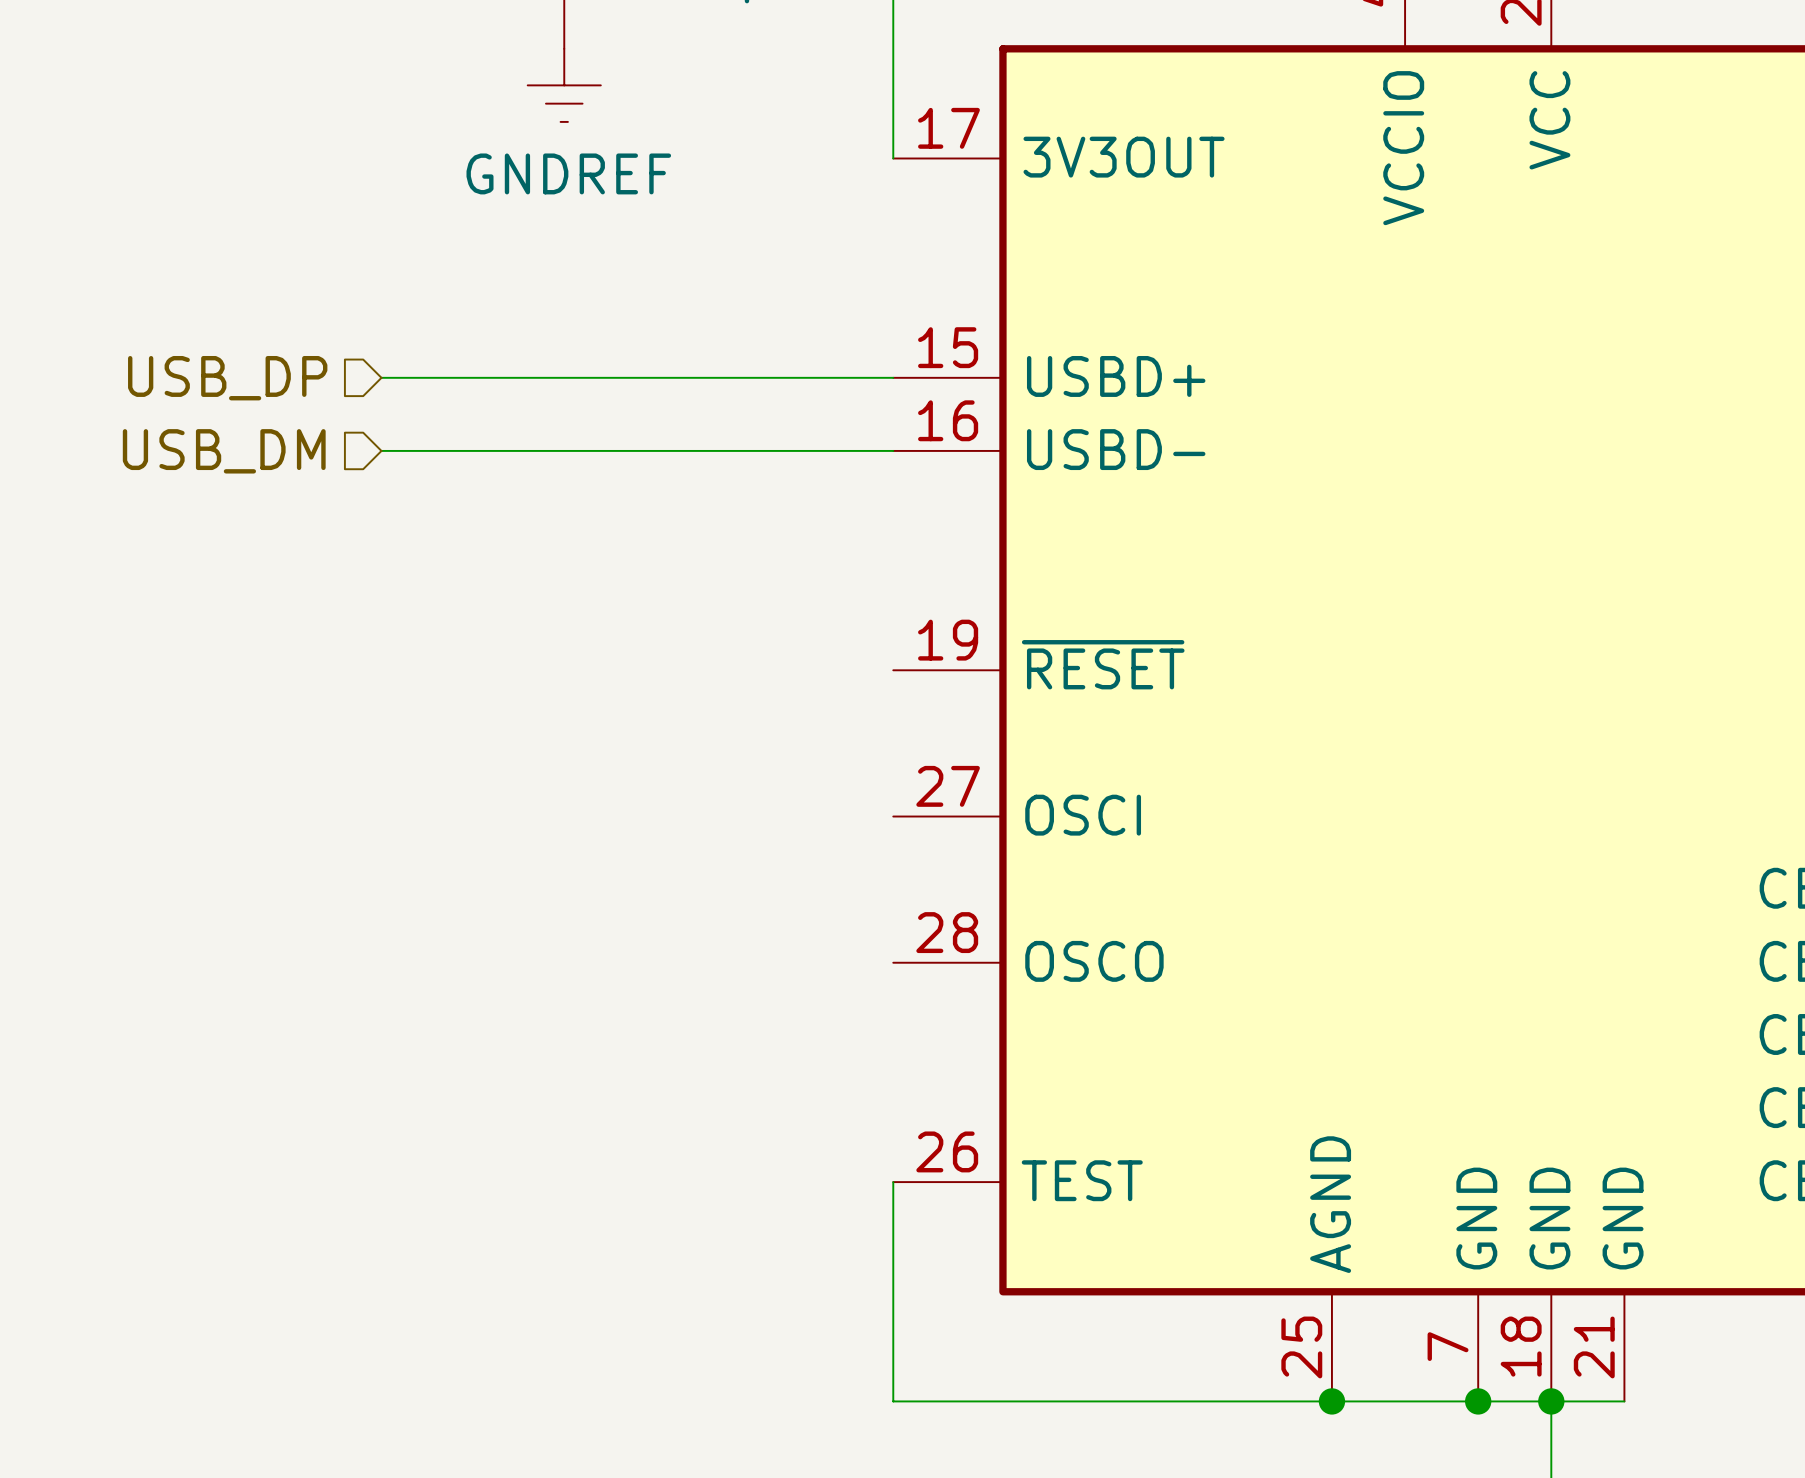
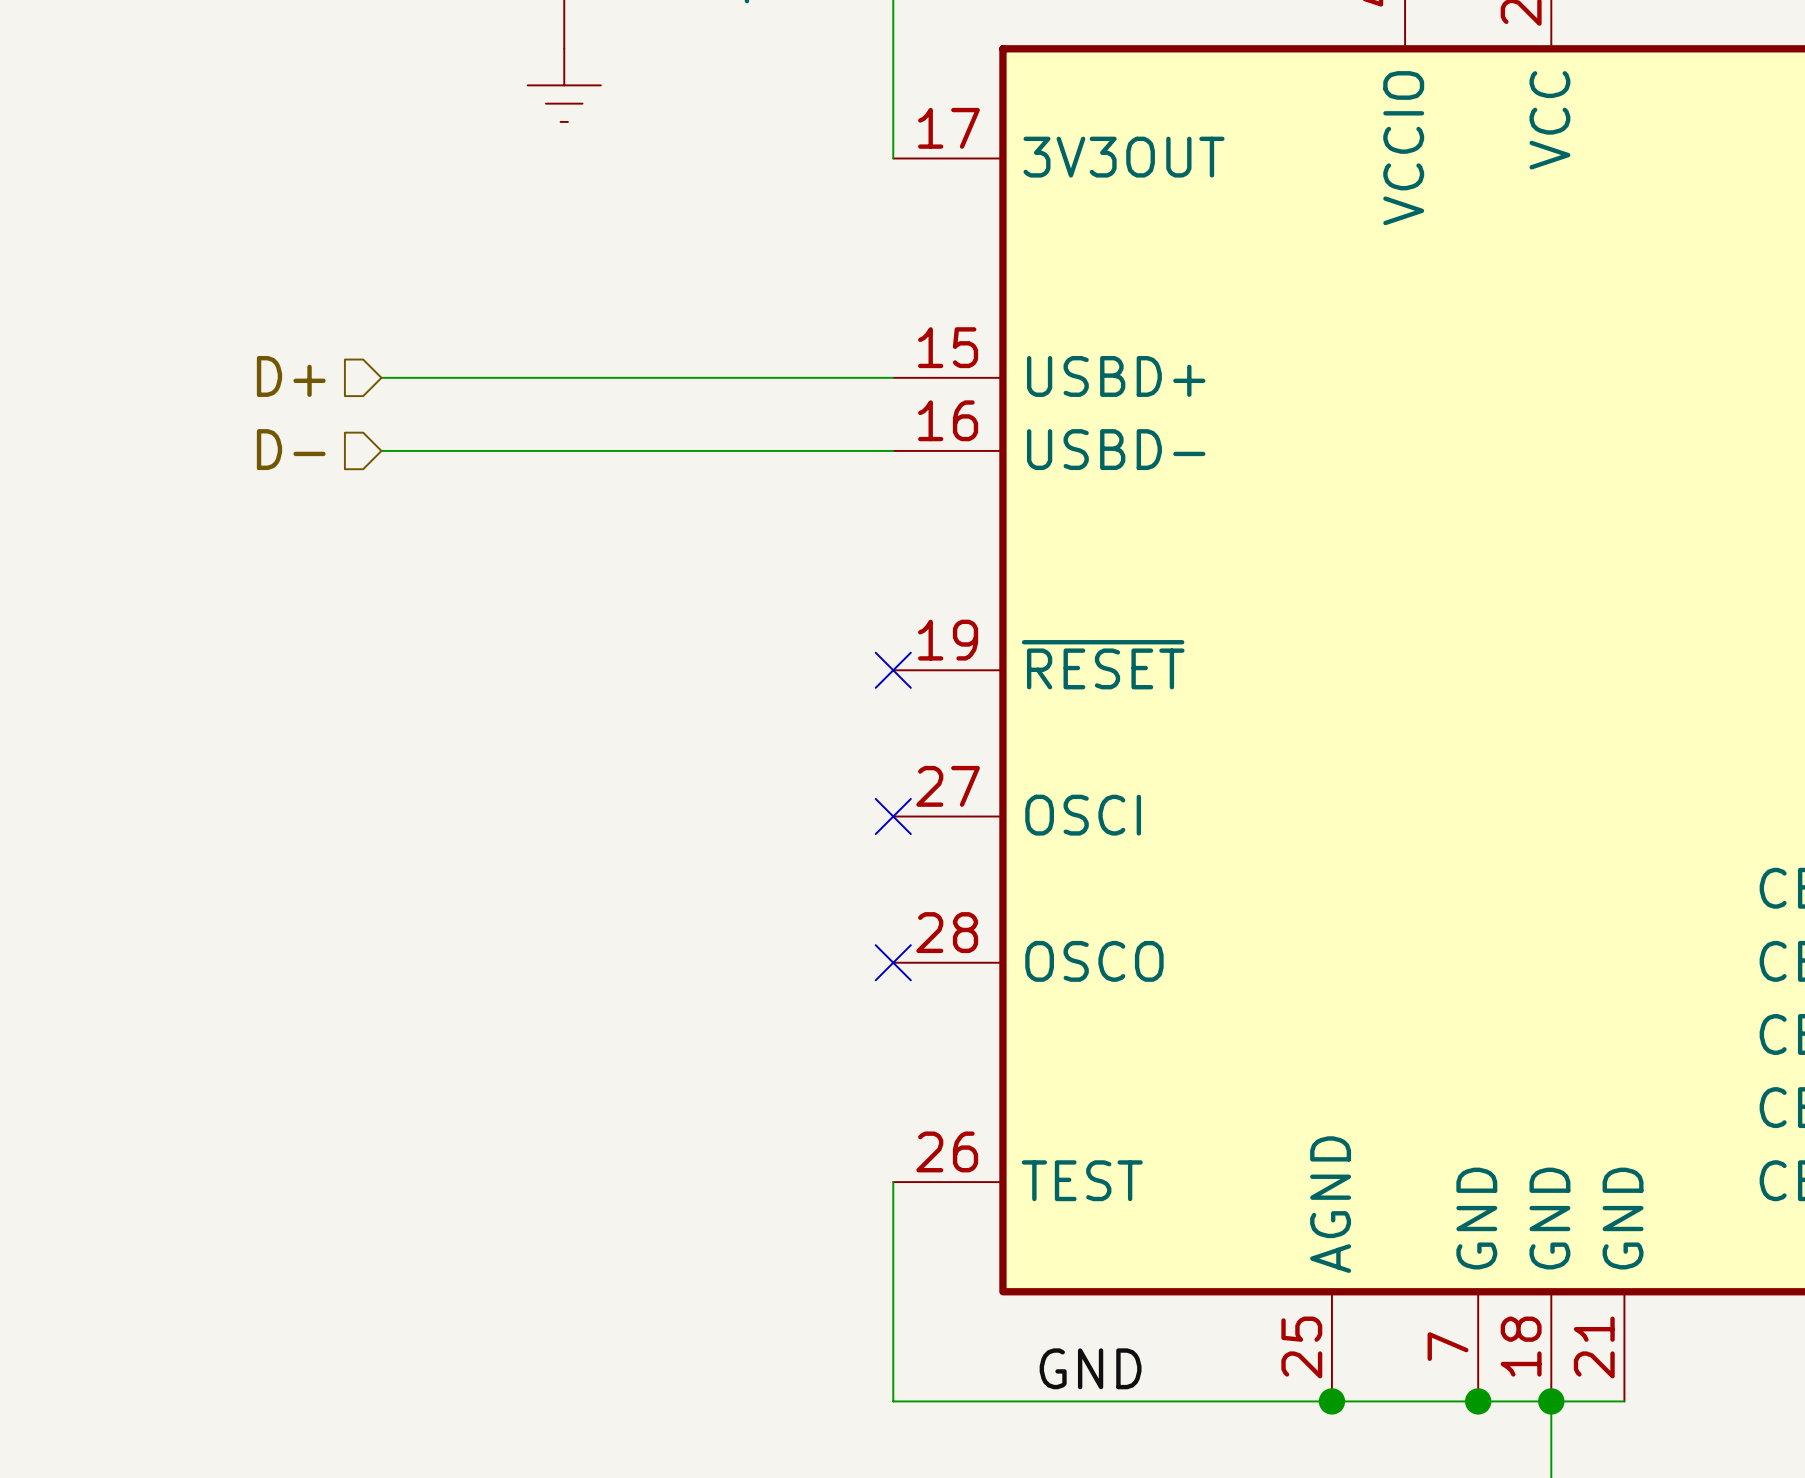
power symbol text: GNDREF (568, 173) -> none
hierarchical label: USB_DP (227, 378) -> D+ (291, 376)
hierarchical label: USB_DM (224, 451) -> D- (291, 449)
no-connect mark: none -> (893, 670)
no-connect mark: none -> (893, 816)
no-connect mark: none -> (893, 962)
label: none -> GND (1090, 1368)

